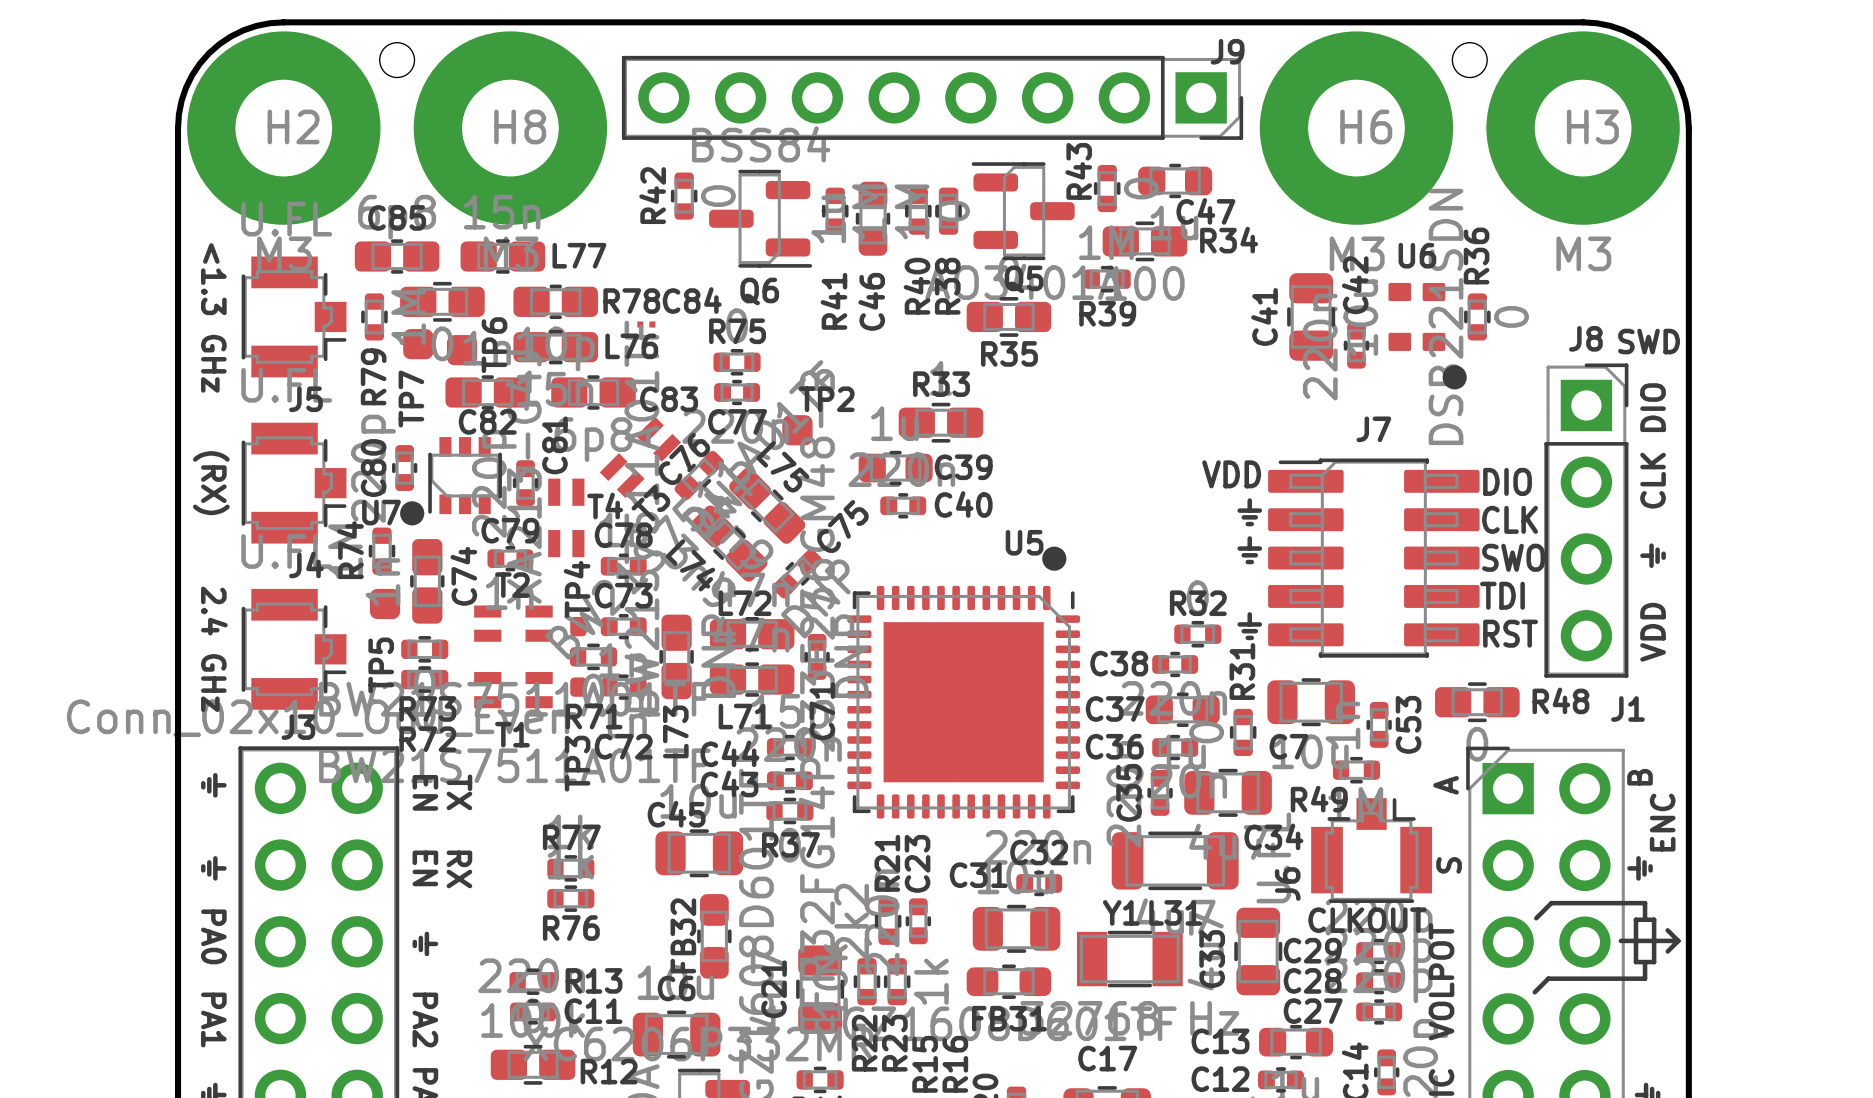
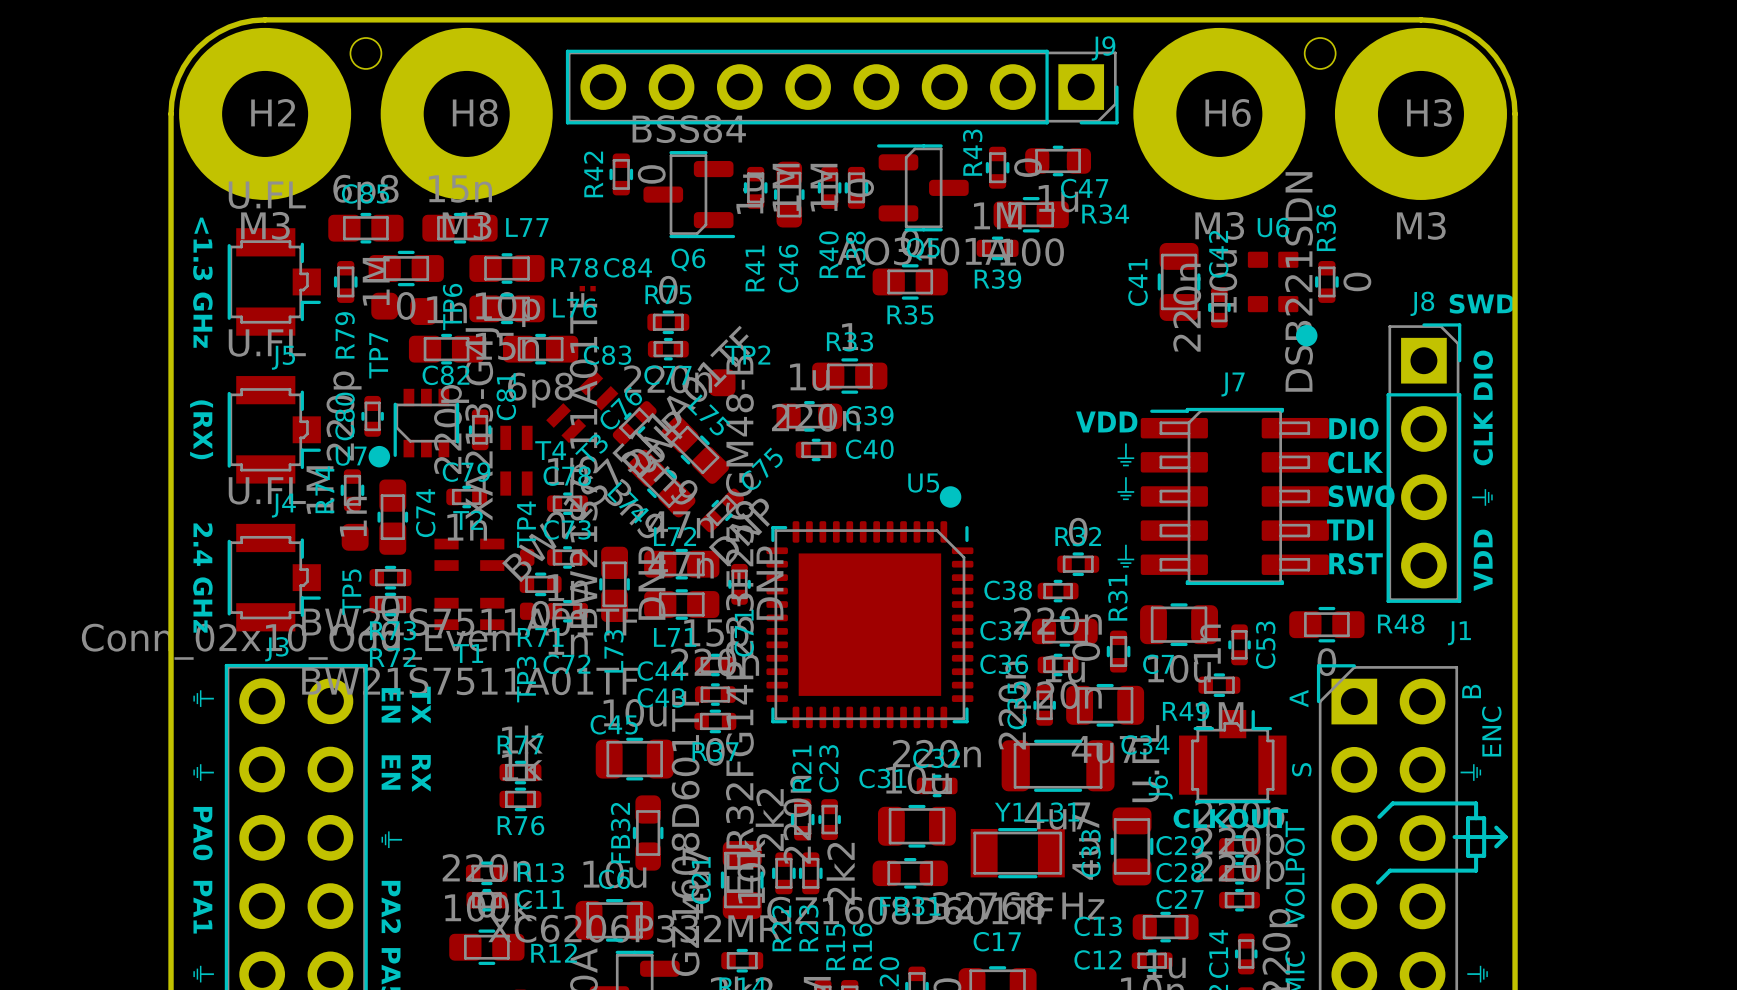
R23 value: 1k (931, 981) -> 2k2 (840, 873)

